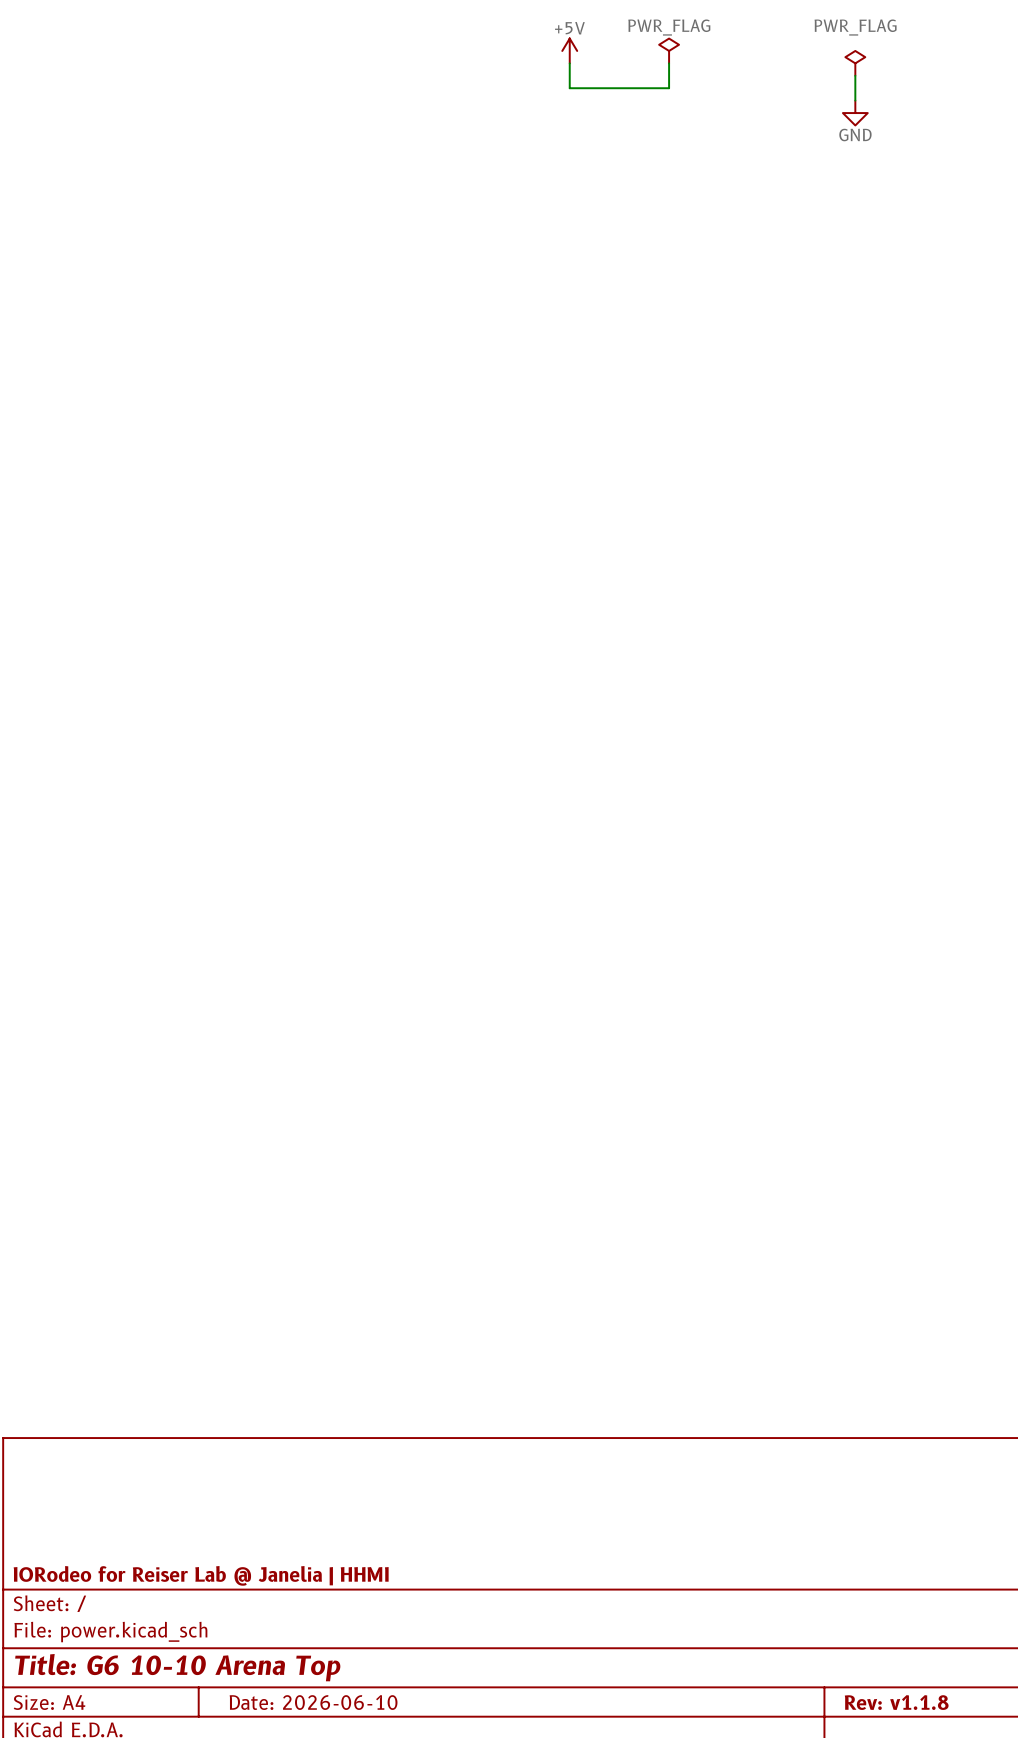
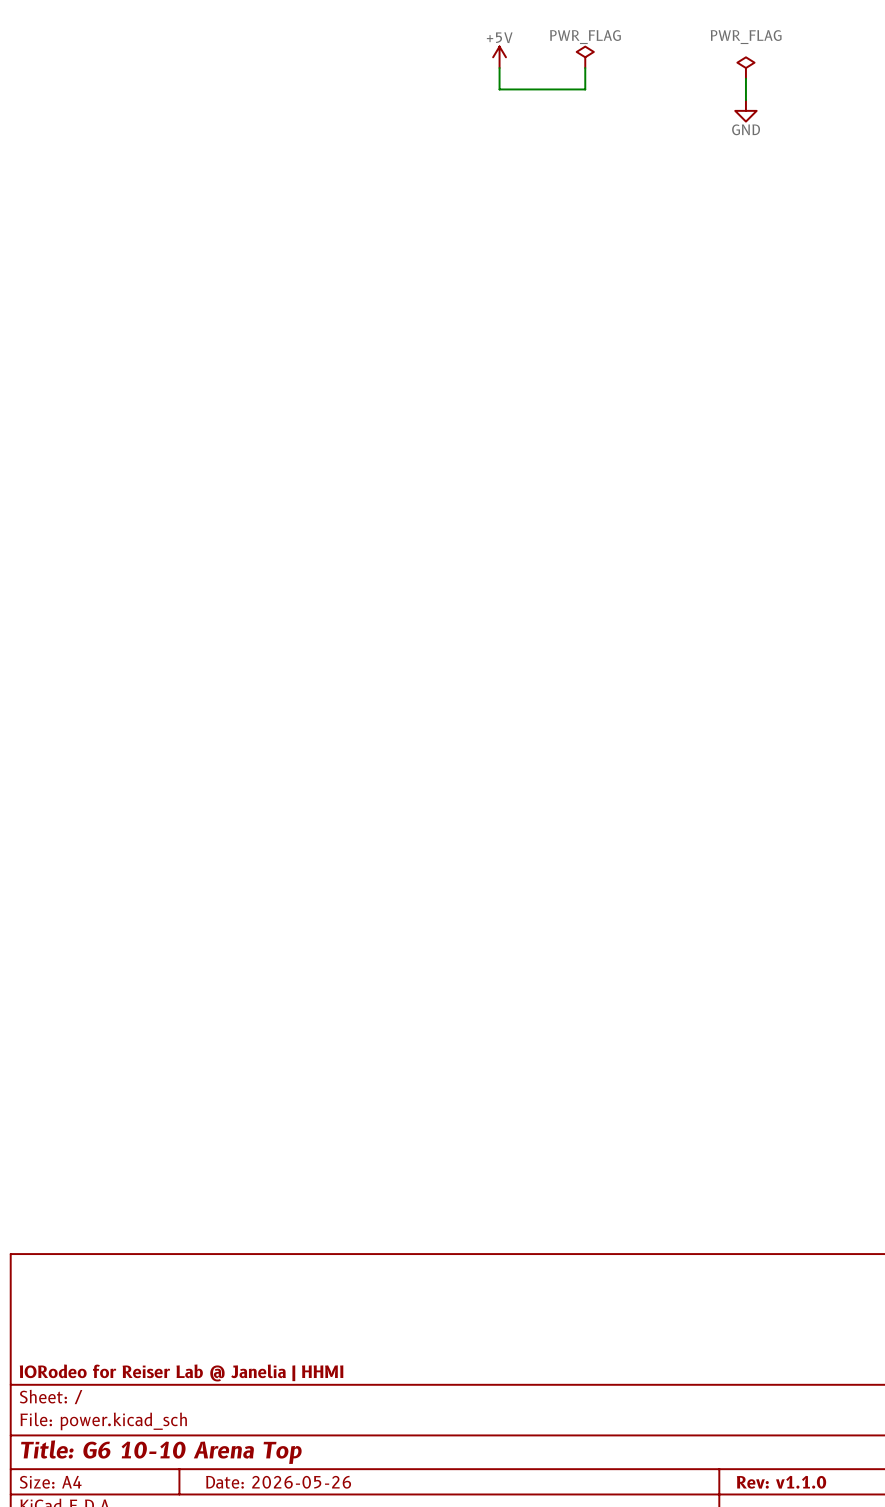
title block: Date: 2026-06-10 (313, 1702) -> Date: 2026-05-26 (278, 1482)
title block: Rev: v1.1.8 (896, 1702) -> Rev: v1.1.0 (781, 1482)

